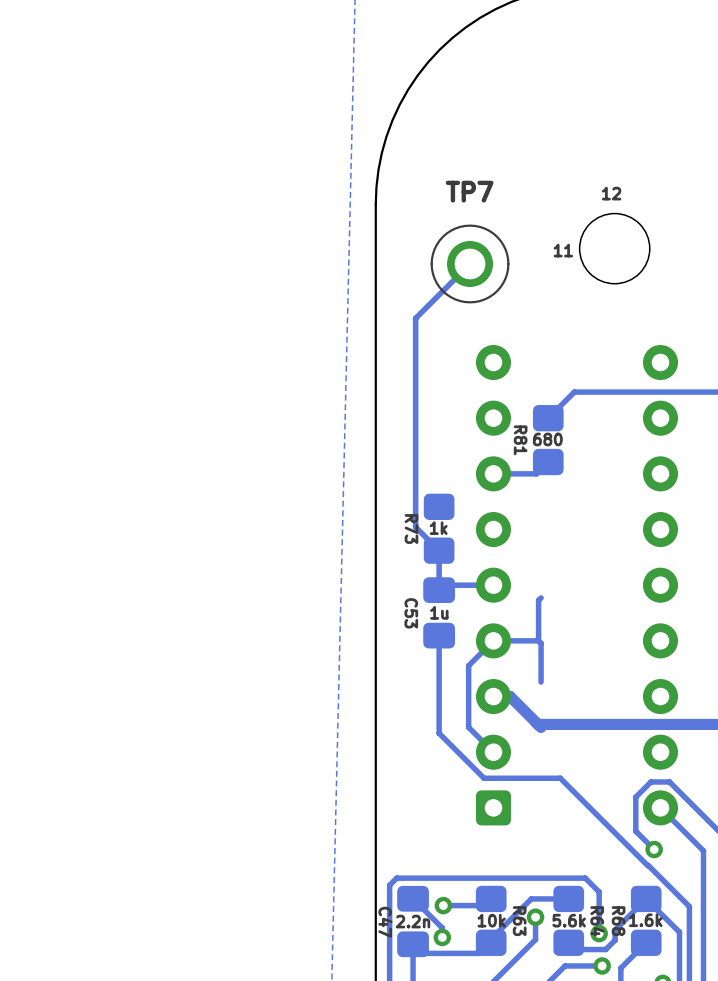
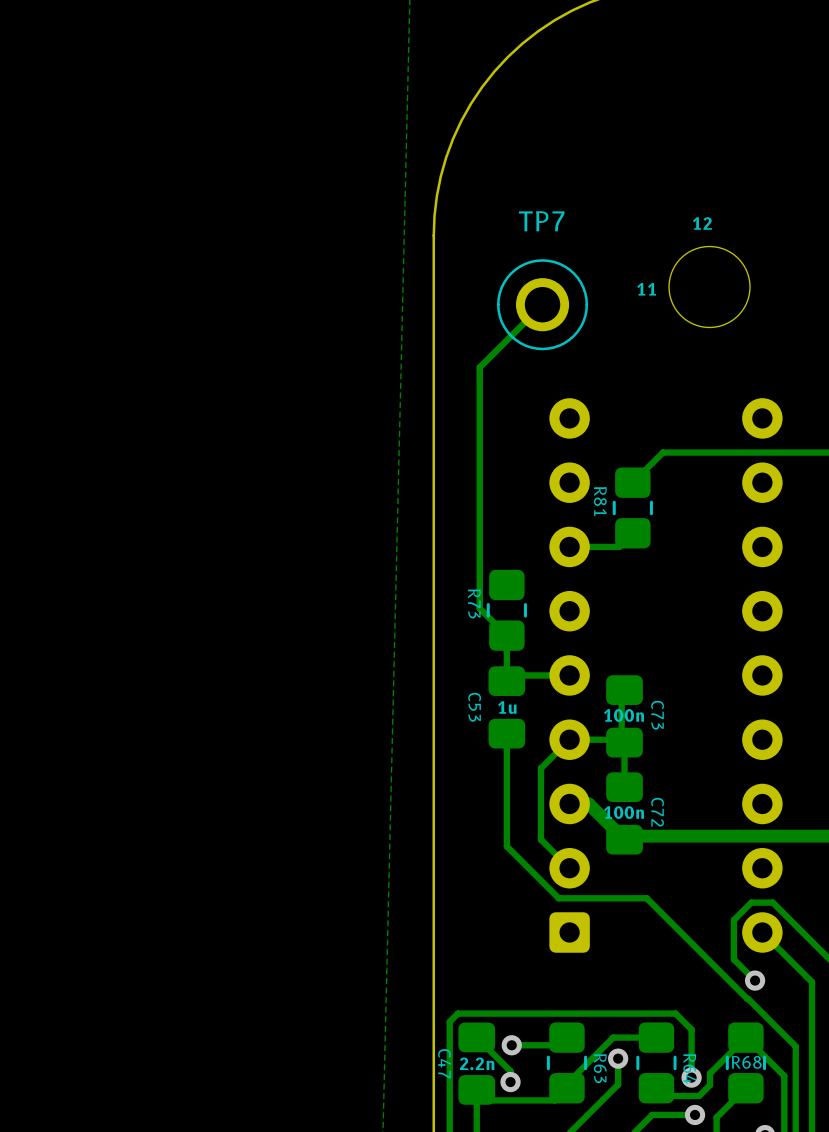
R81 footprint: [532, 405, 564, 476] -> [612, 467, 653, 549]
R81 value: 680 (547, 439) -> none
R73 footprint: [423, 493, 455, 564] -> [486, 569, 527, 651]
R73 value: 1k (438, 528) -> none
C73: none -> 100n (624, 716)
C72: none -> 100n (624, 813)
R63 footprint: [475, 885, 507, 956] -> [546, 1022, 588, 1104]
R64 footprint: [553, 885, 585, 956] -> [636, 1022, 677, 1104]
R68 footprint: [630, 885, 662, 956] -> [725, 1022, 767, 1104]
R63 value: 10k (491, 920) -> none
R64 value: 5.6k (569, 920) -> none
R68 value: 1.6k (645, 920) -> none

